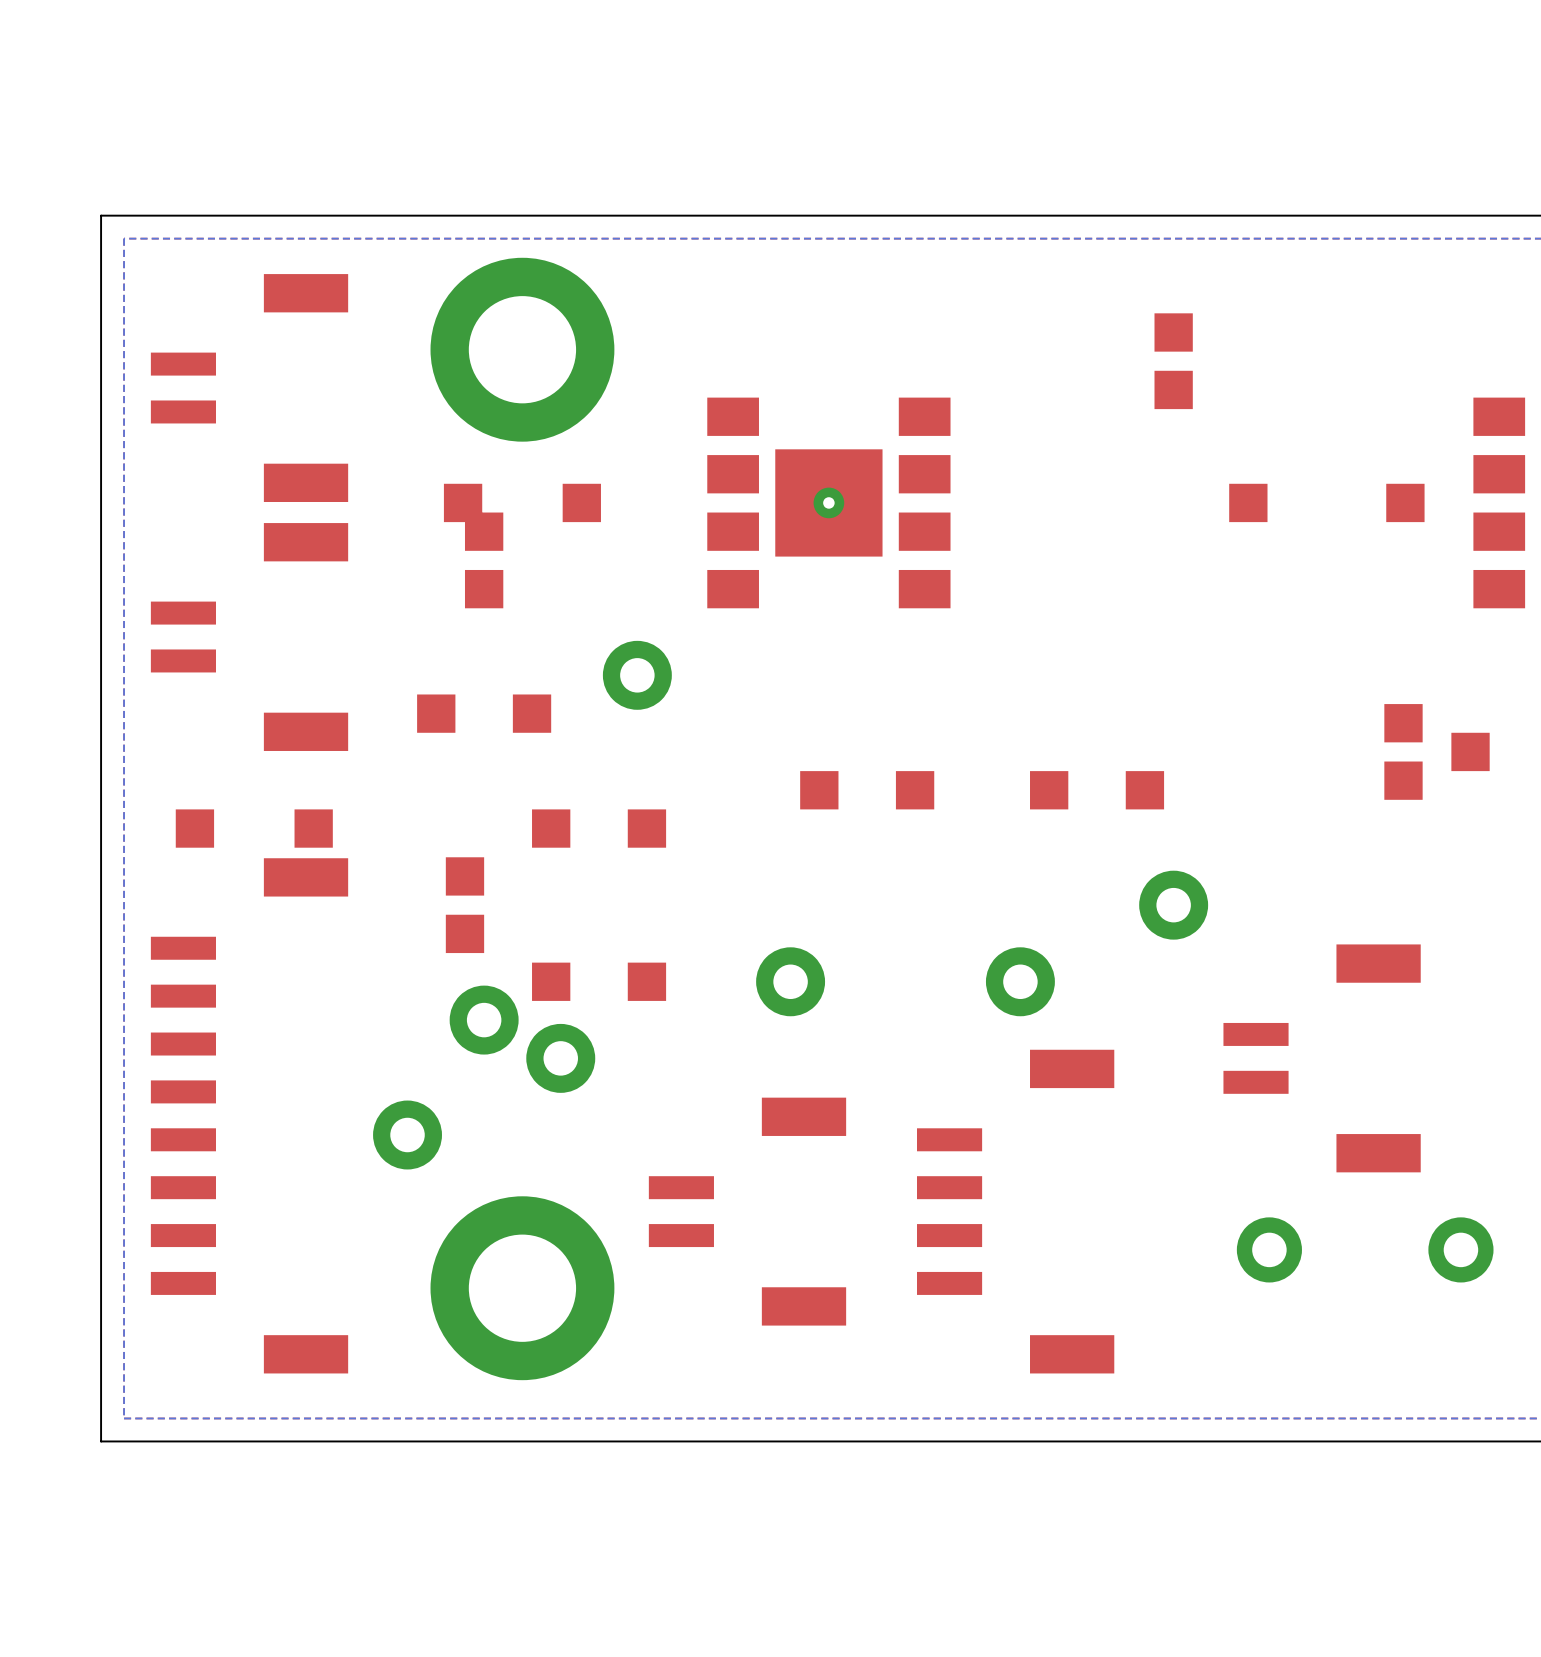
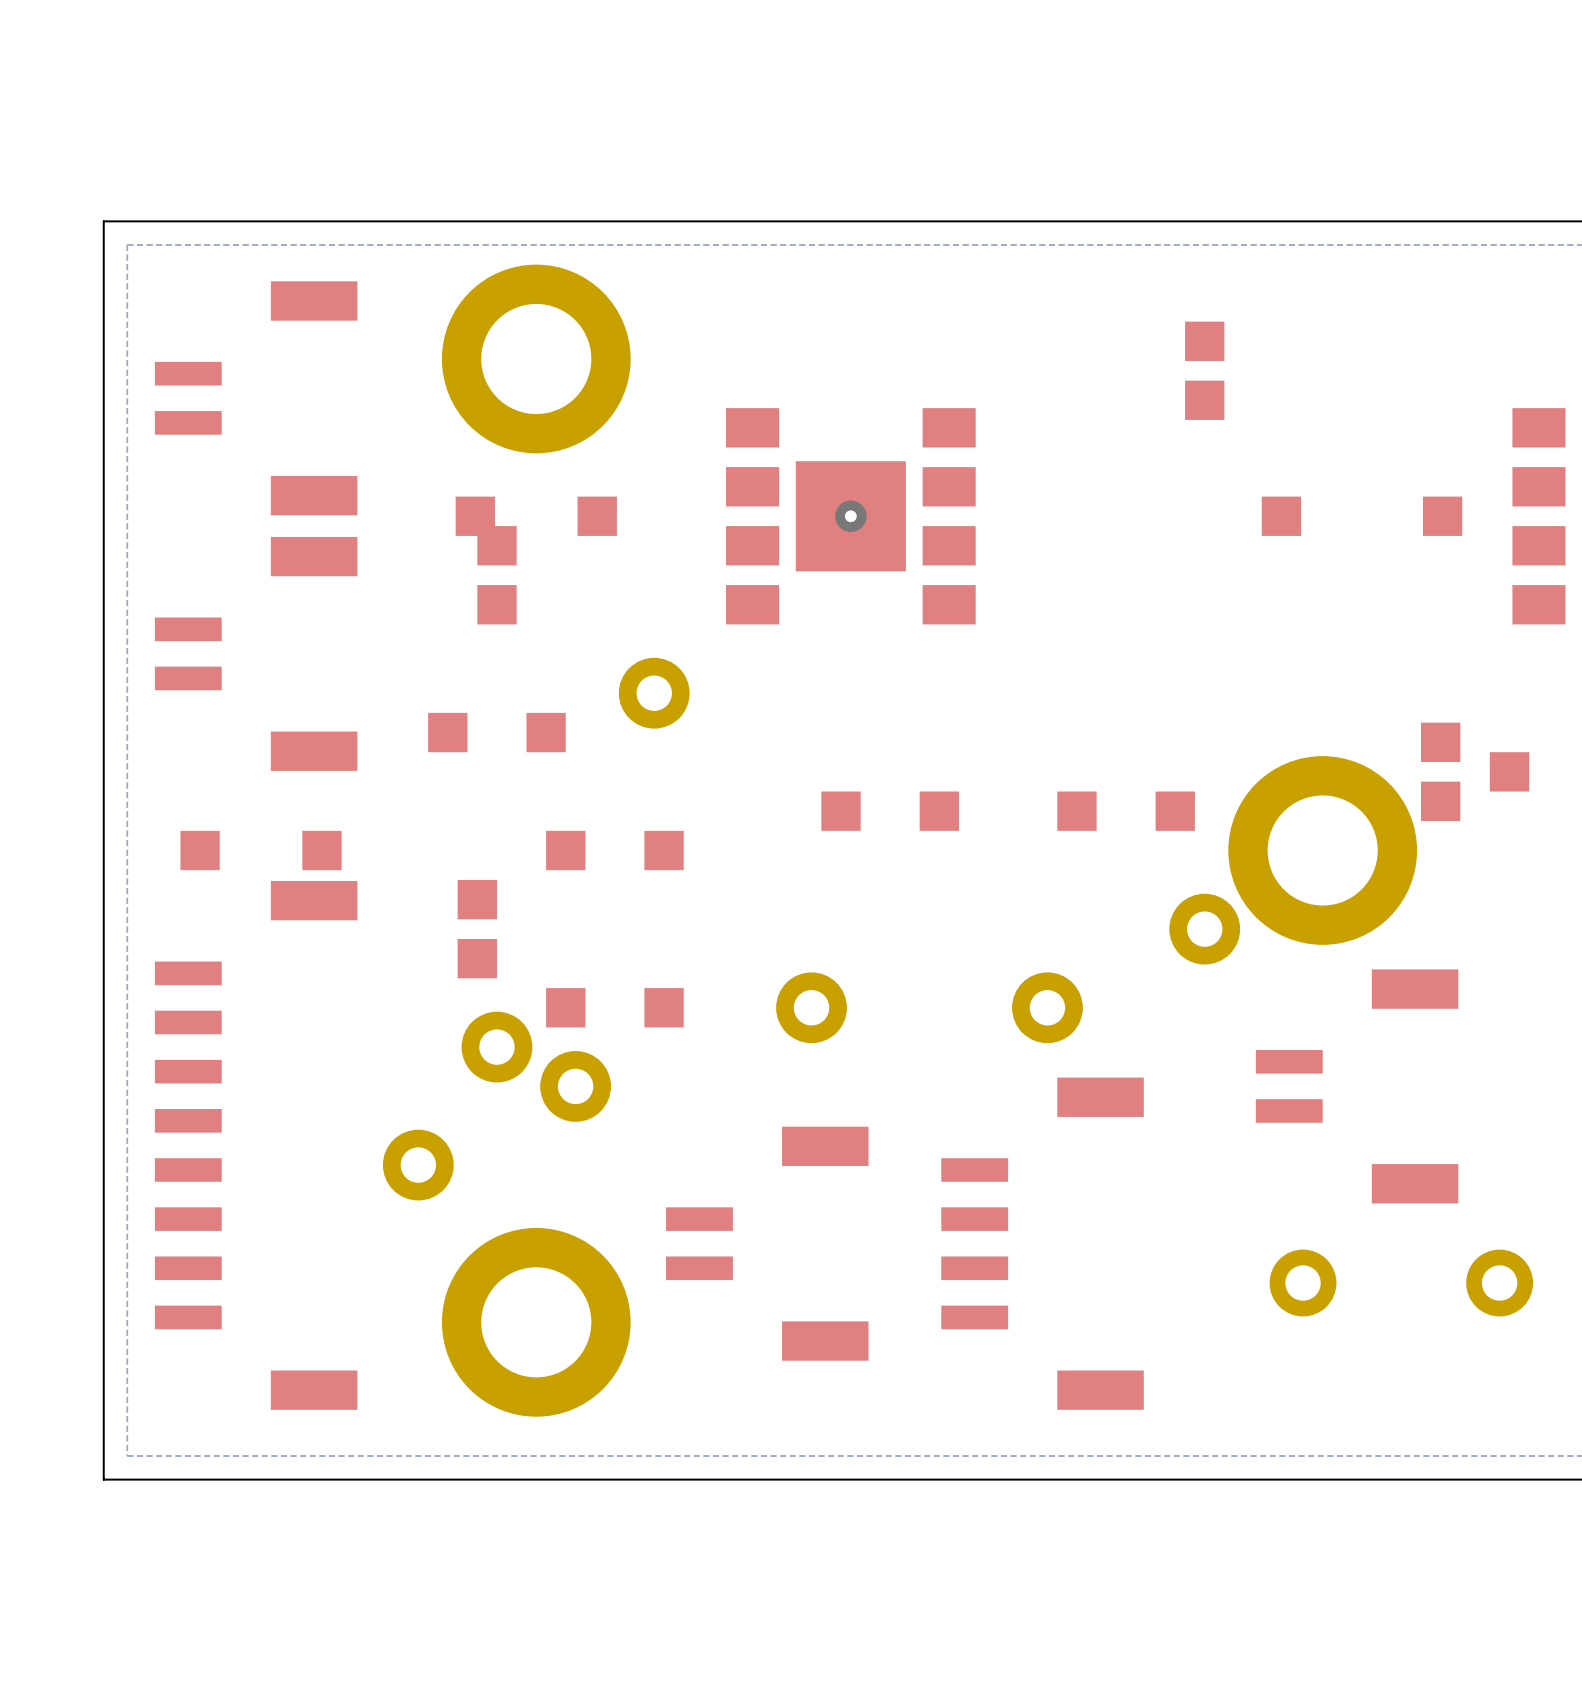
part: none -> (1322, 850)

